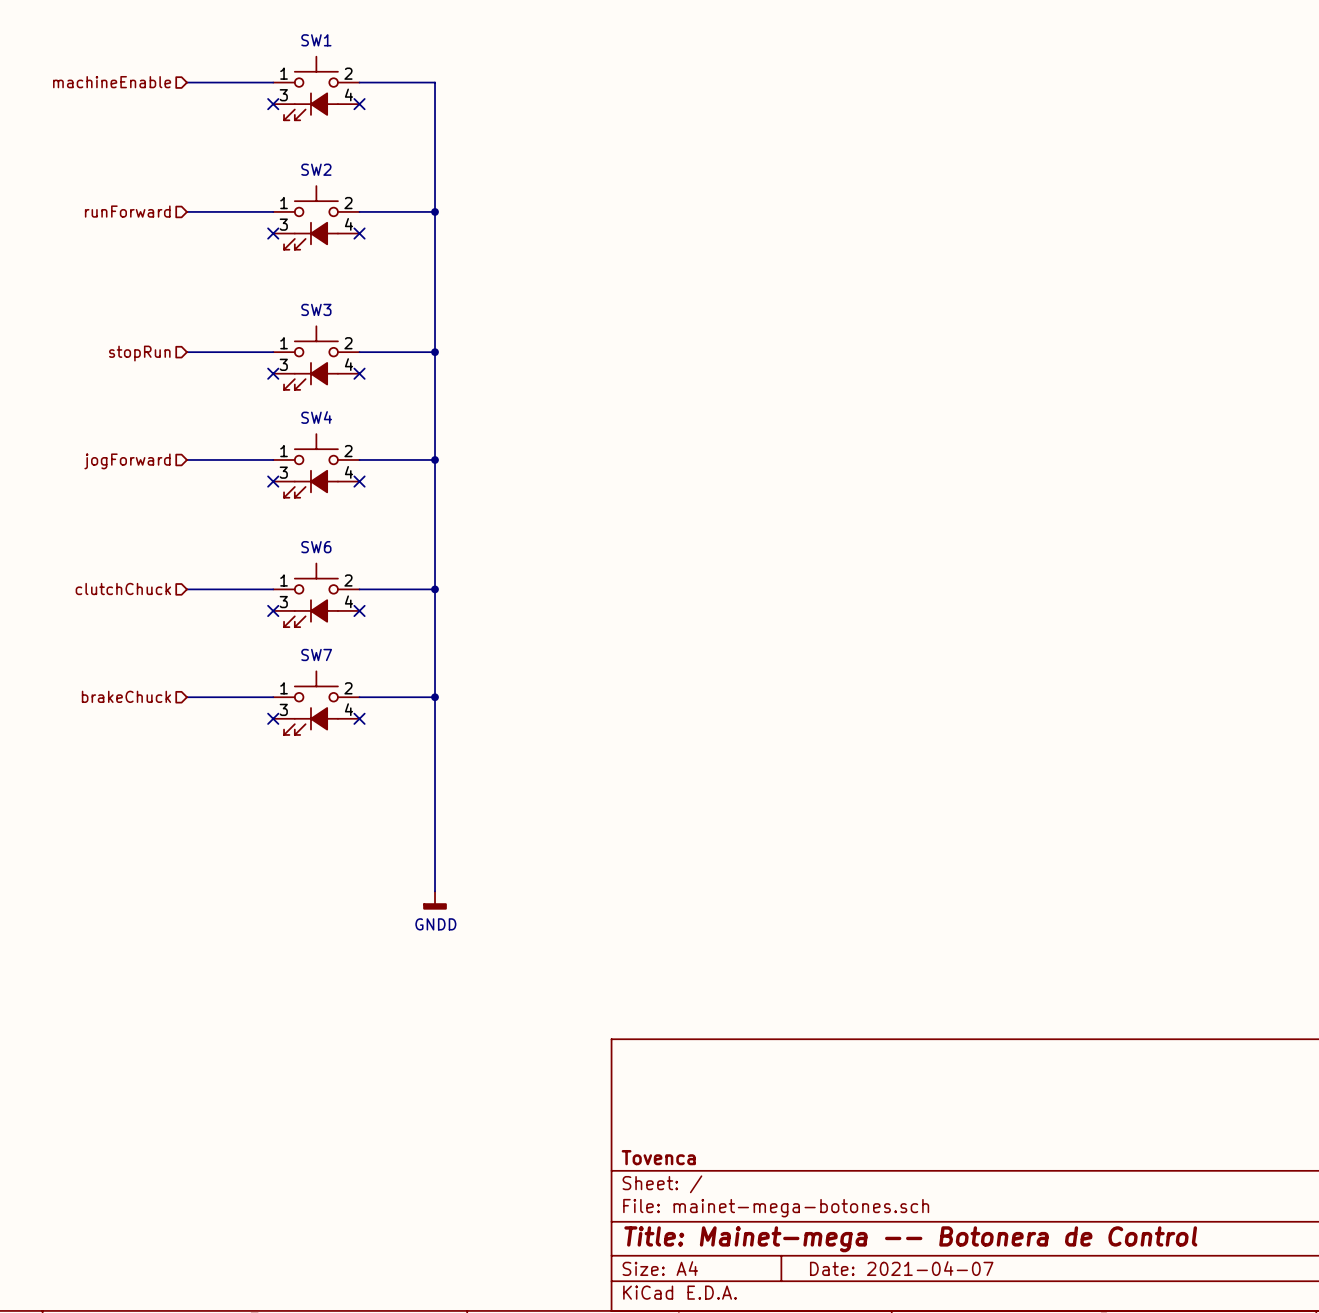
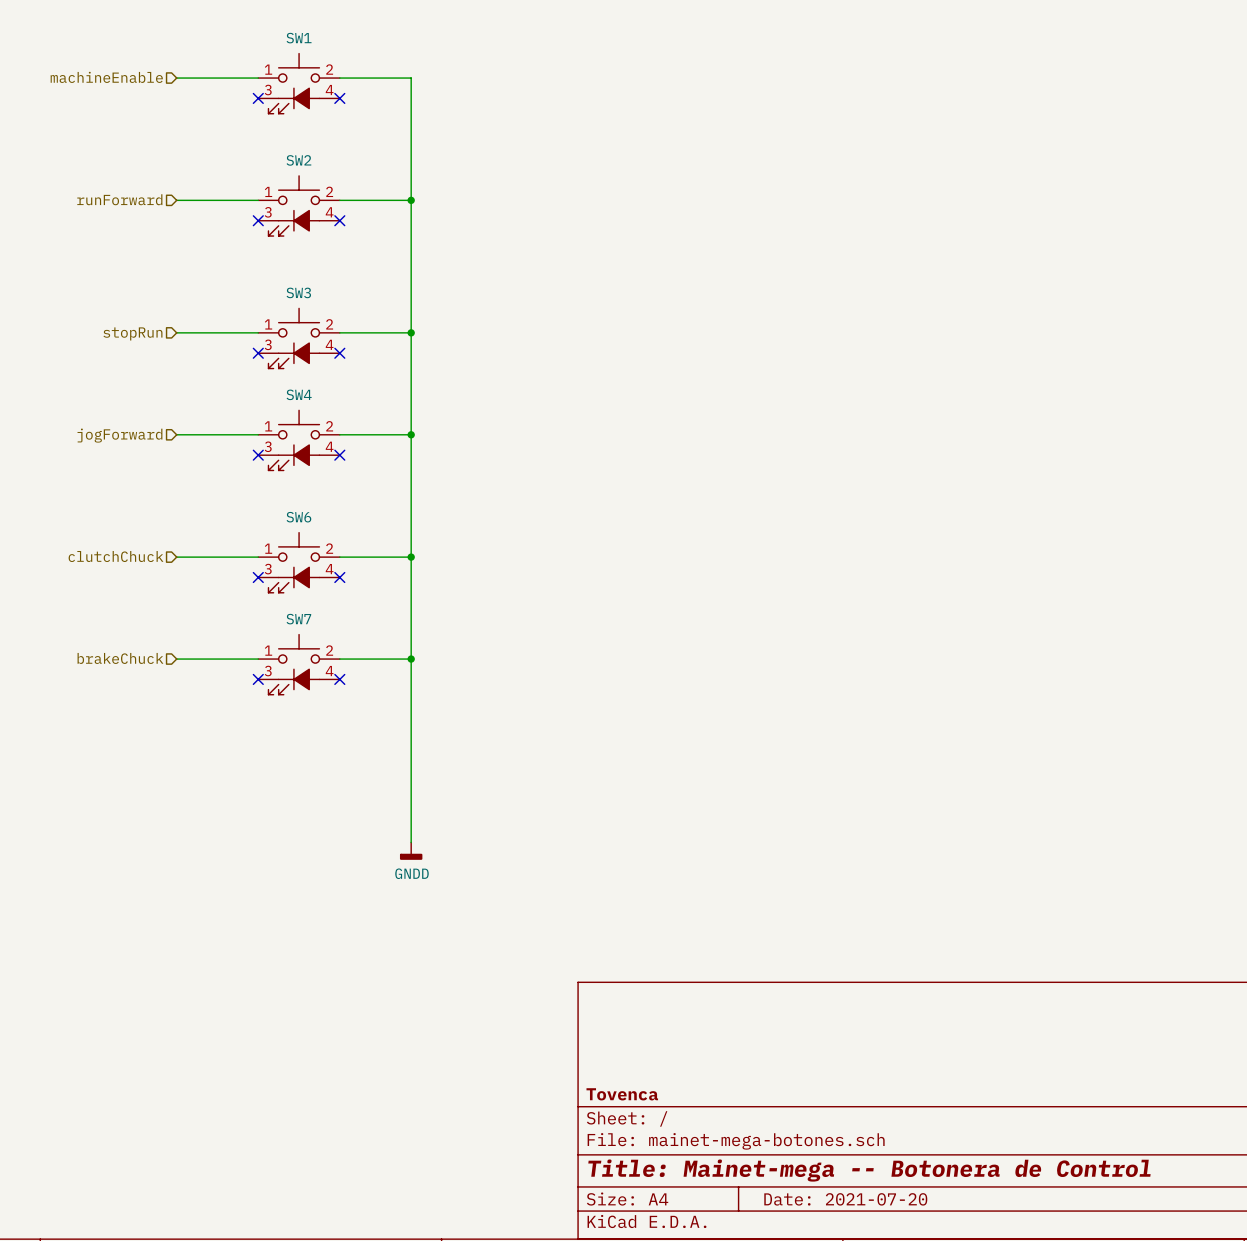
title block: Date: 2021-04-07 (901, 1268) -> Date: 2021-07-20 (845, 1199)

